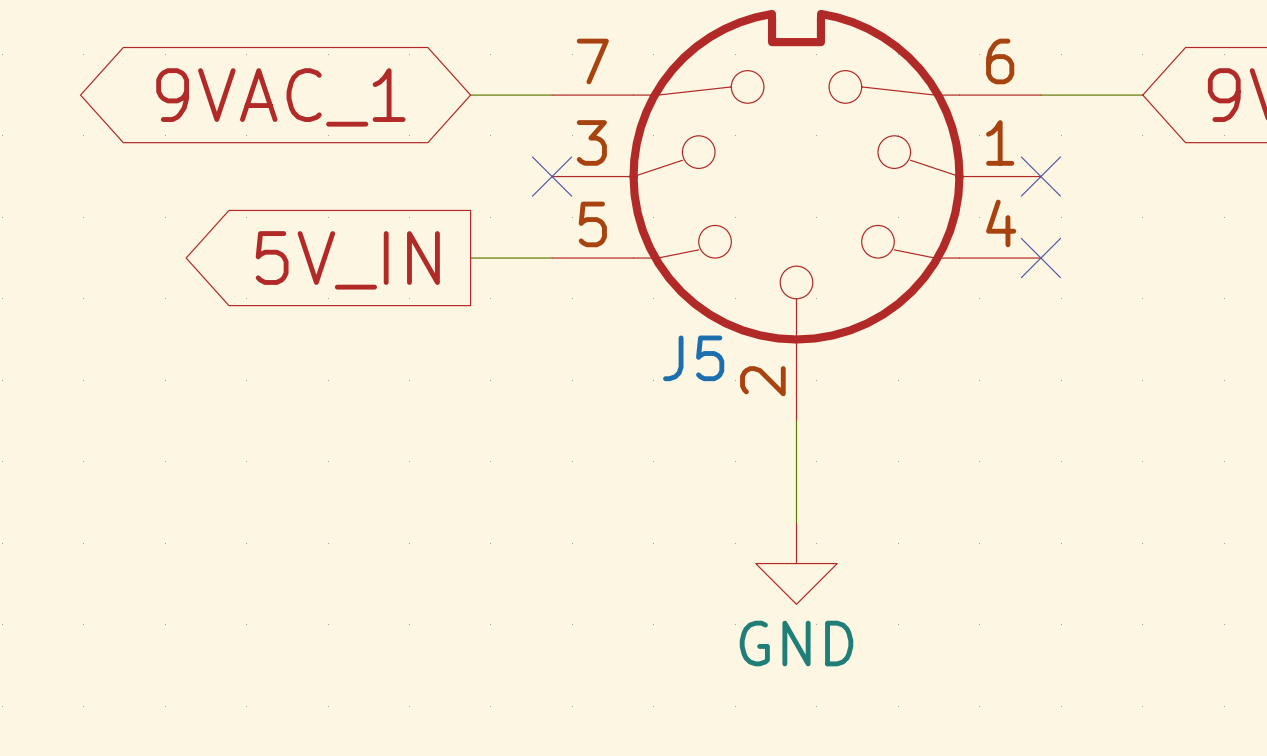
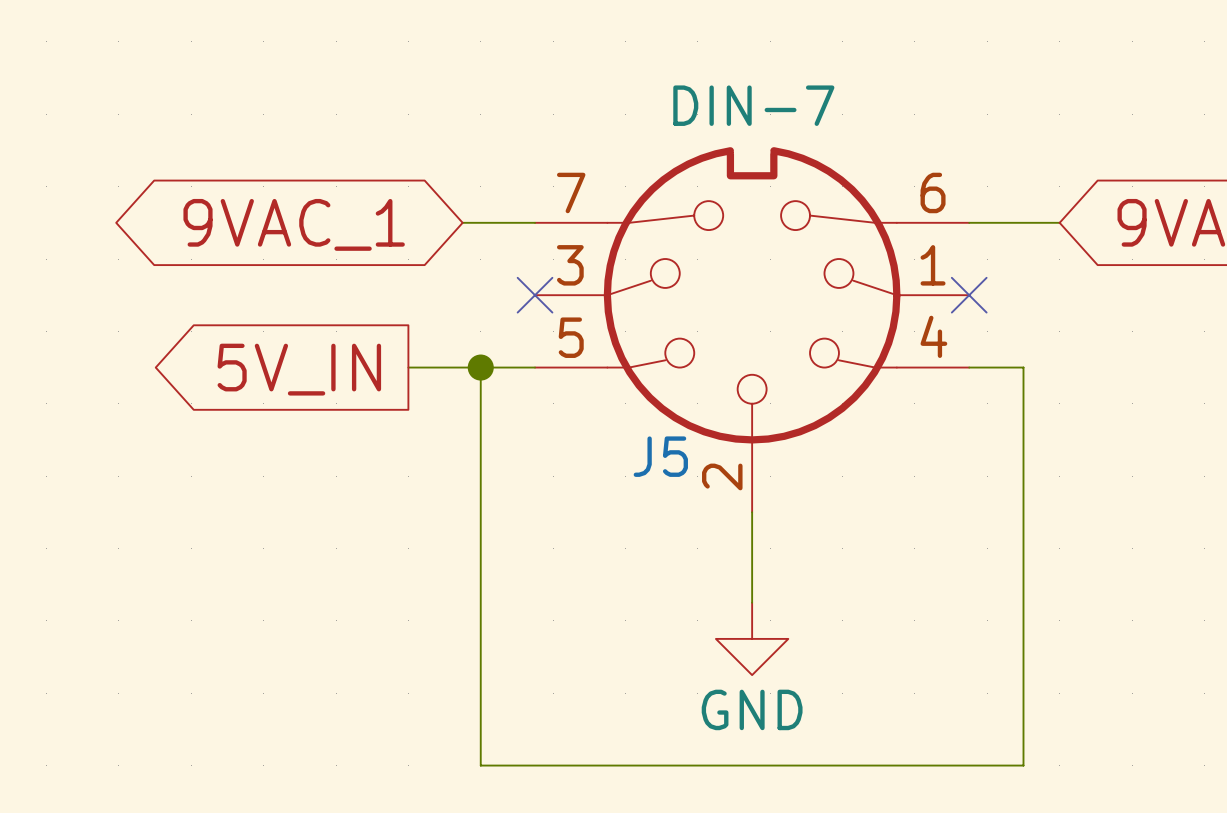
wire: none -> (408, 367) (462, 367)
wire: none -> (480, 367) (480, 765) (1023, 765) (1023, 367) (969, 367)
junction: none -> (480, 367)
no-connect mark: (1040, 258) -> none
global label position: 5V_IN (347, 260) -> 5V_IN (299, 369)

